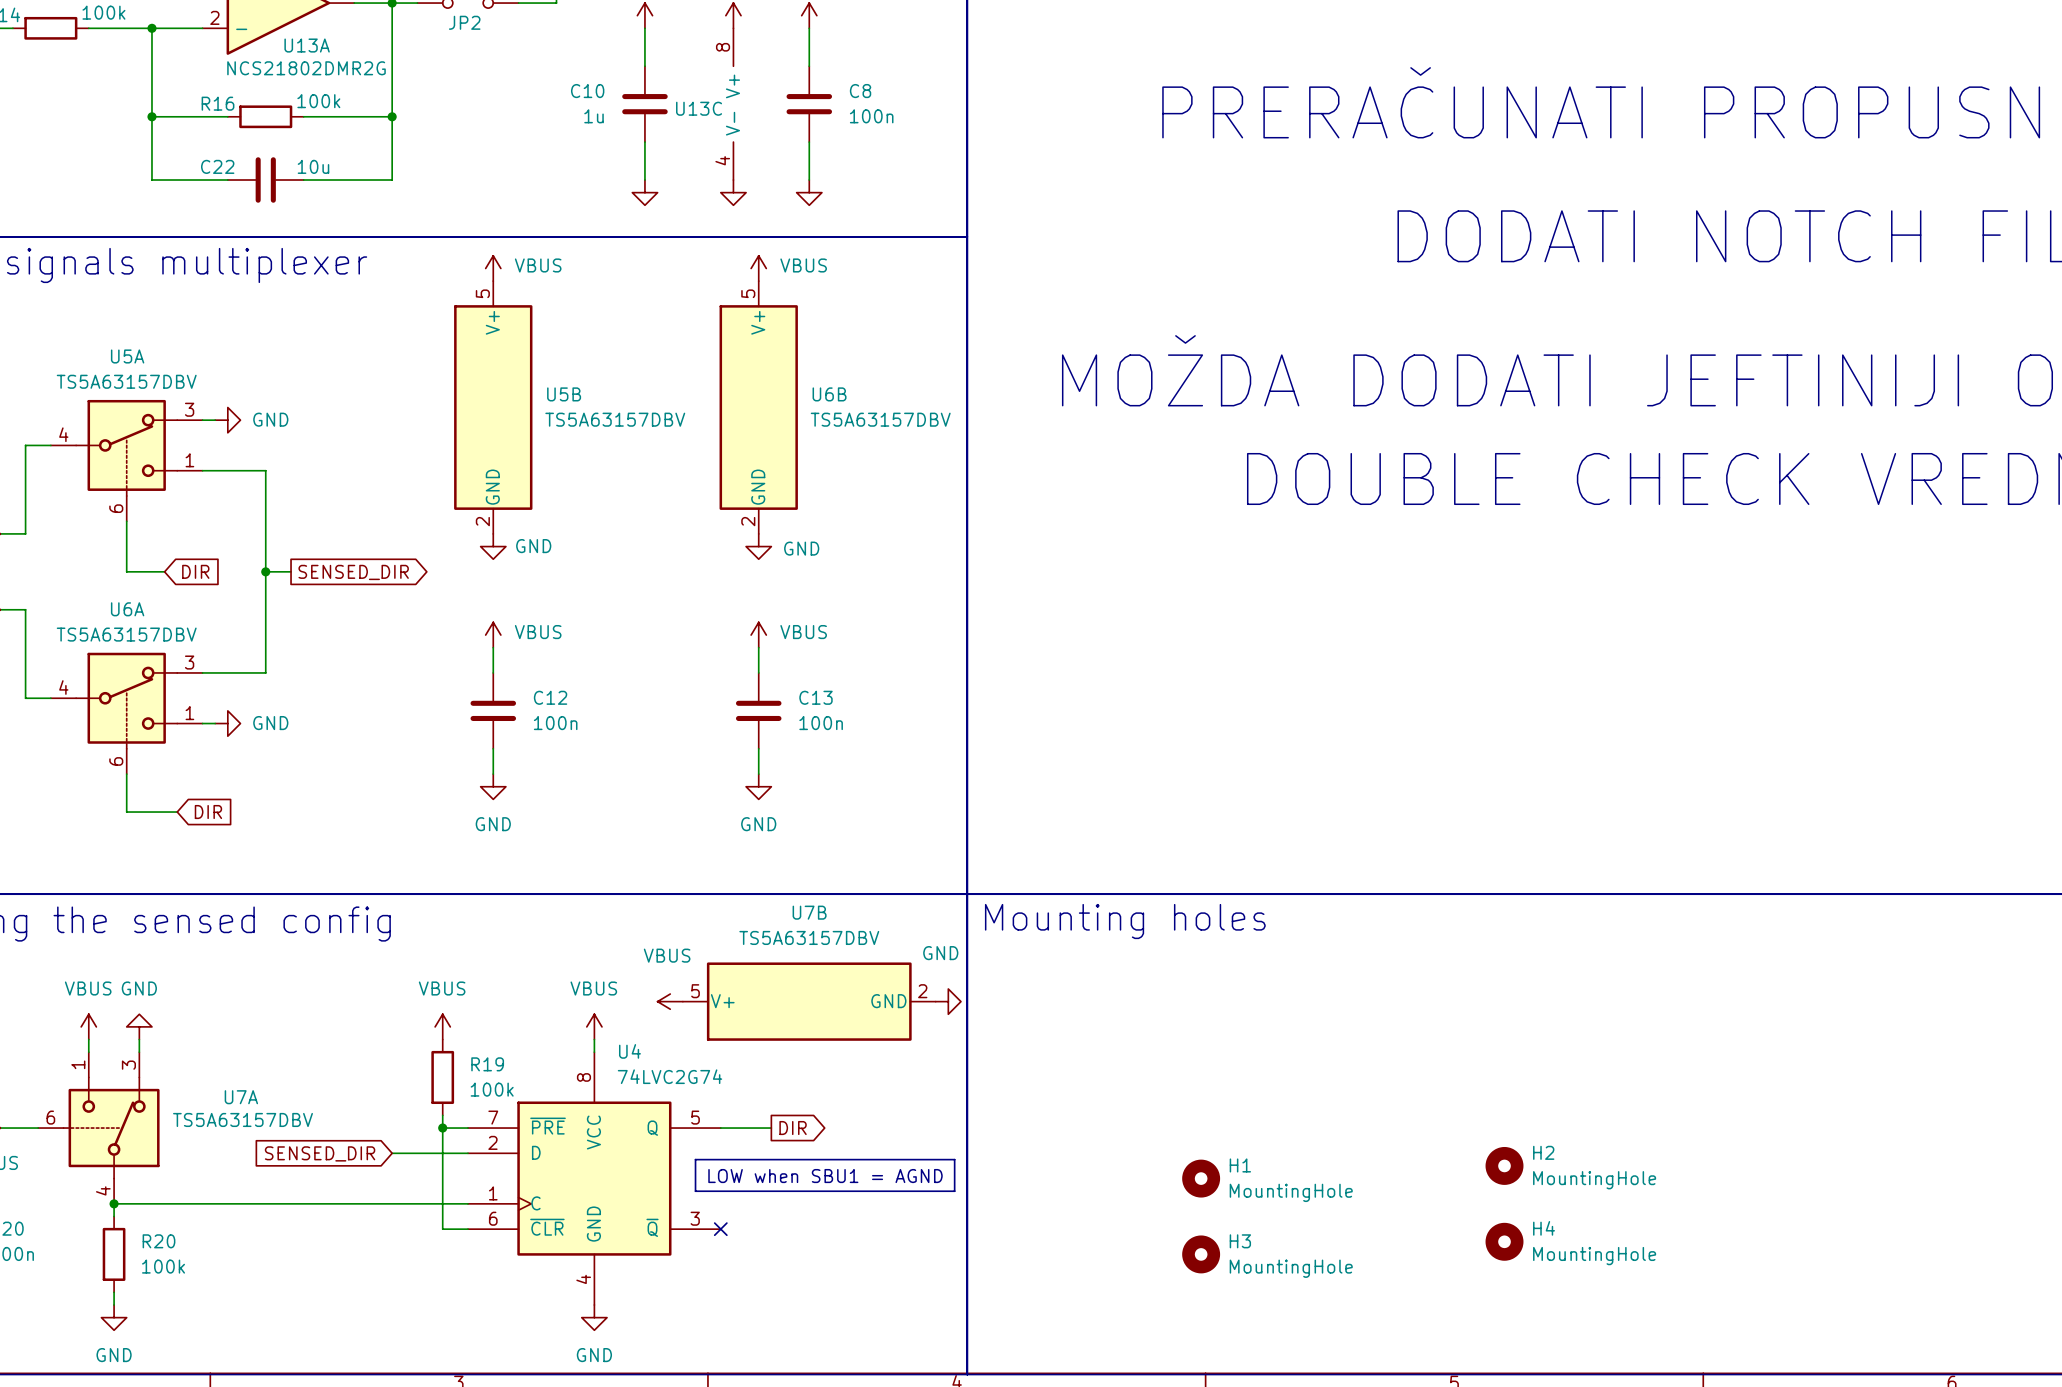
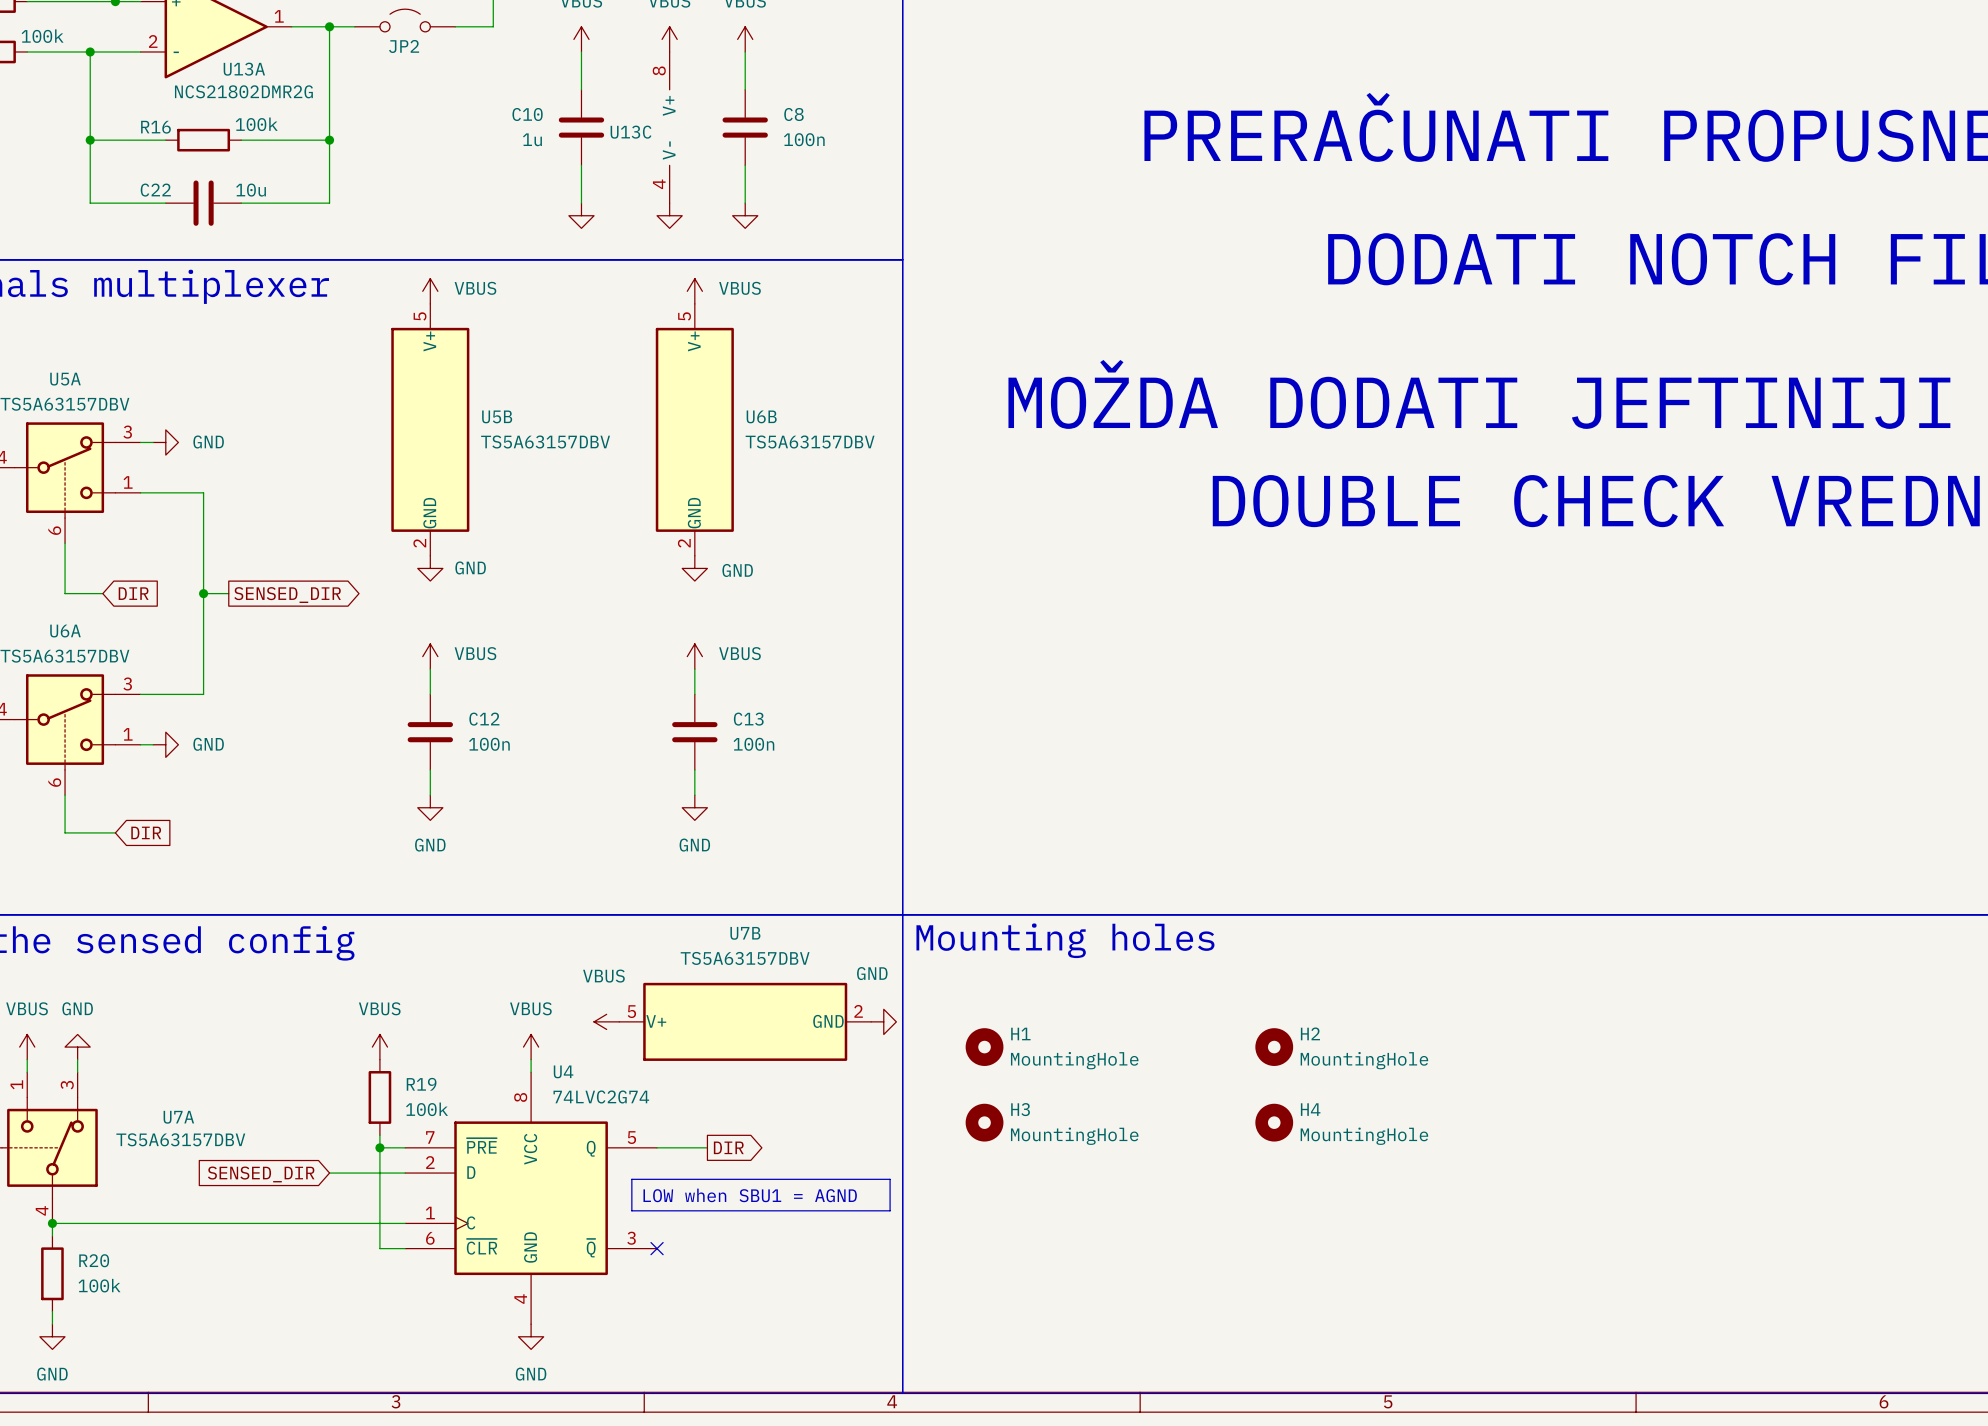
H2 position: (1504, 1165) -> (1274, 1047)
H1 position: (1201, 1178) -> (984, 1047)
H4 position: (1504, 1241) -> (1274, 1122)
H3 position: (1201, 1254) -> (984, 1122)

